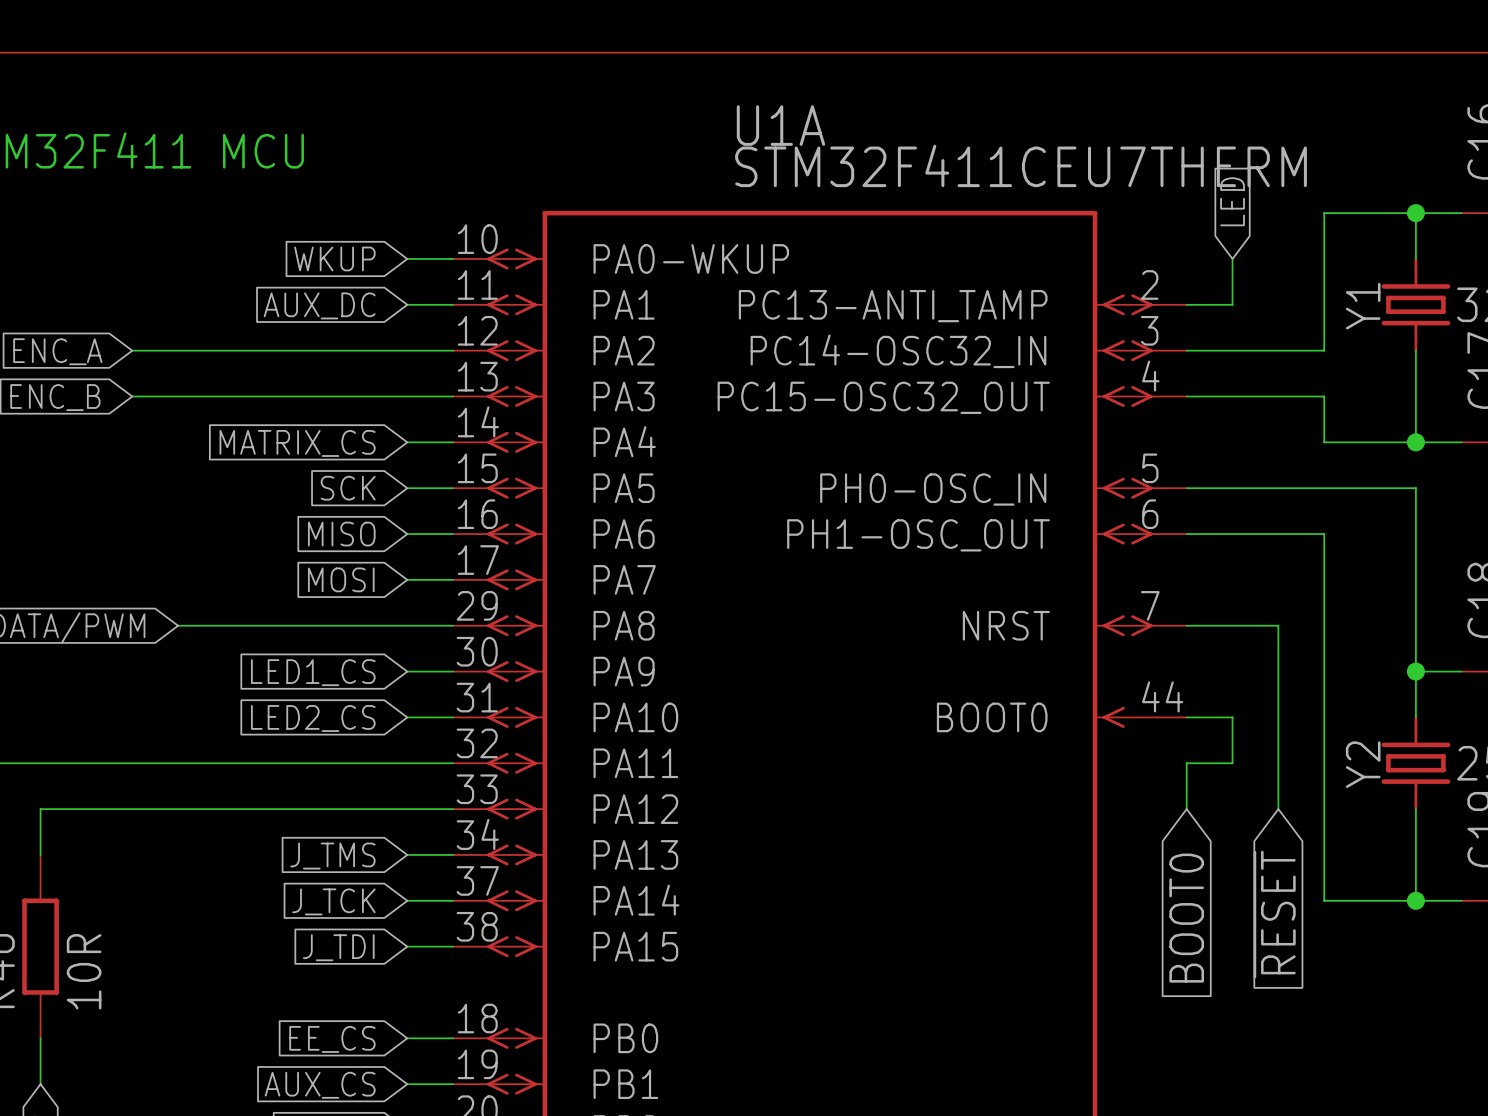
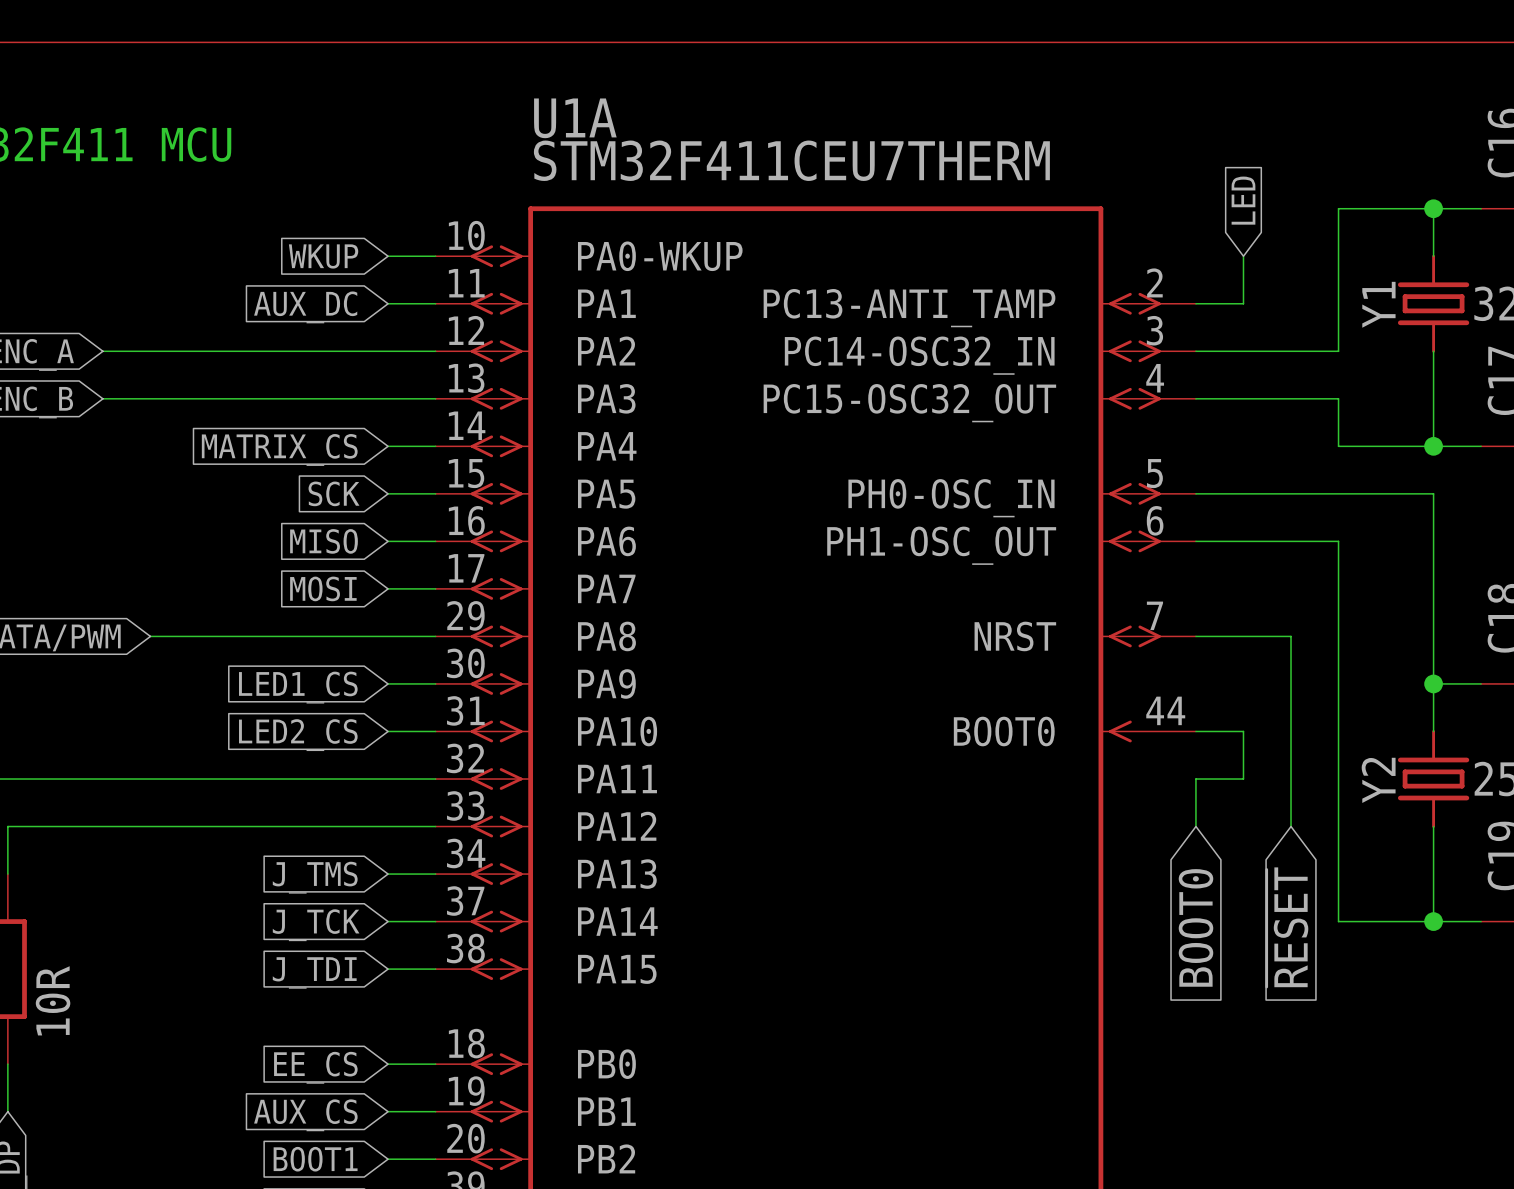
U1A name position: U1A (780, 125) -> U1A (575, 118)
U1A value position: STM32F411CEU7THERM (1021, 165) -> STM32F411CEU7THERM (791, 160)

